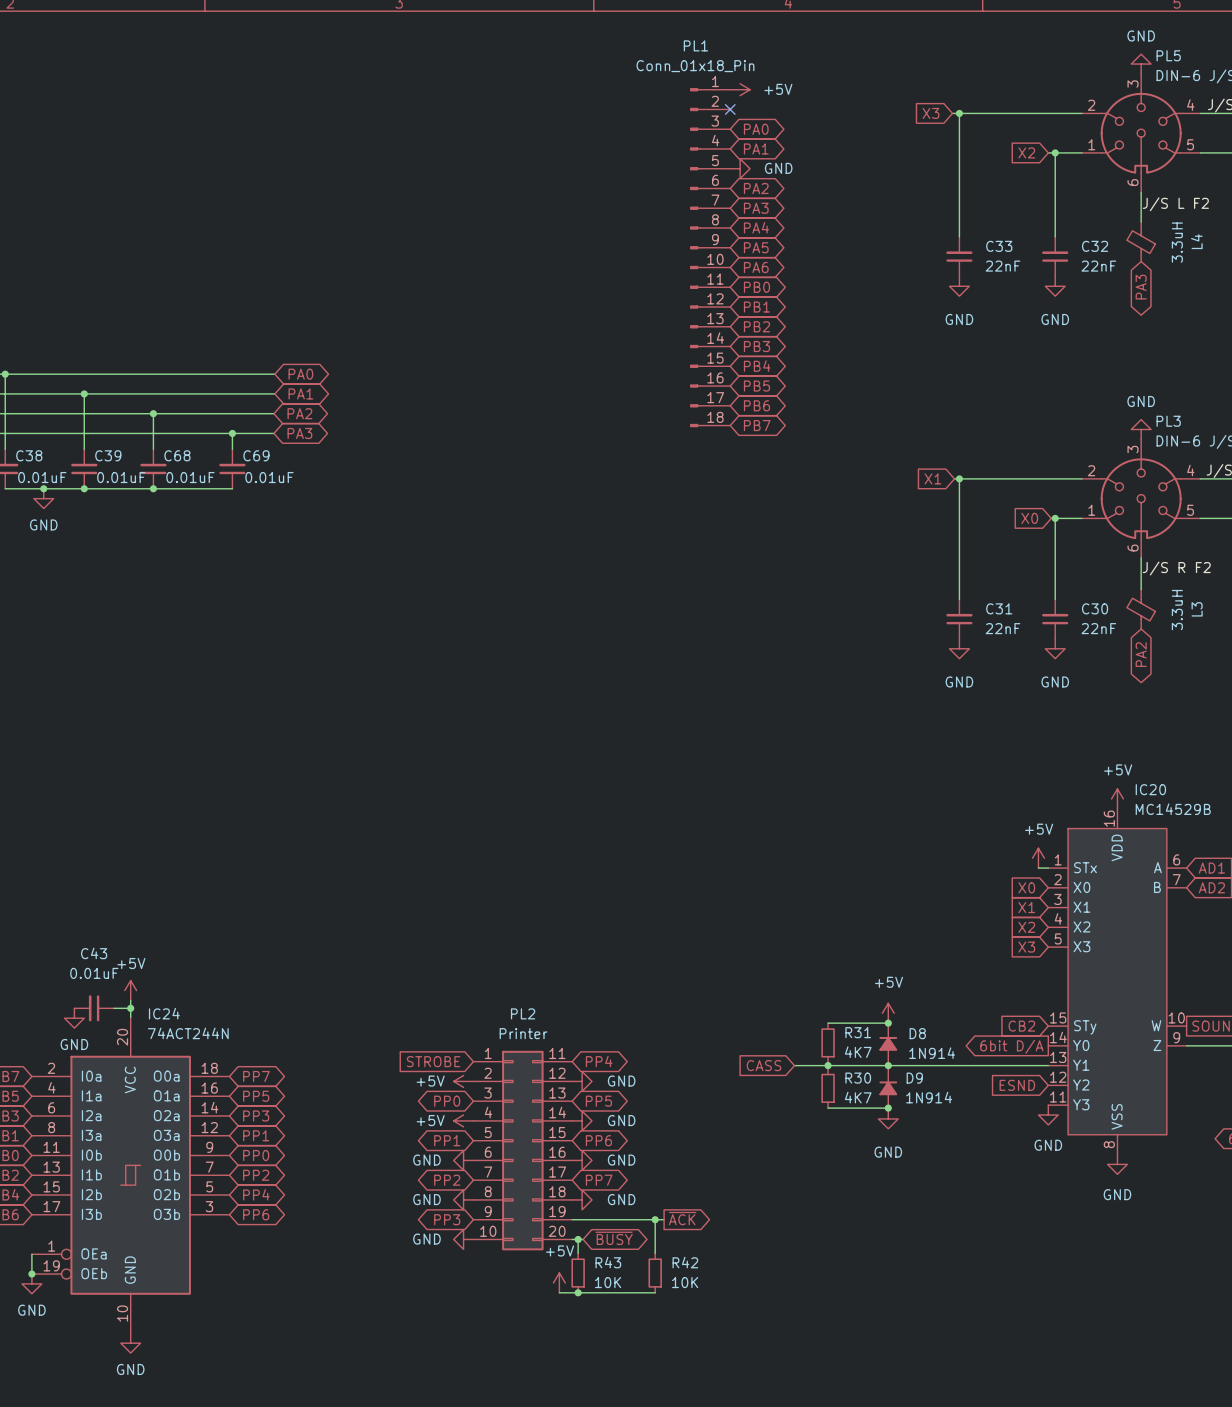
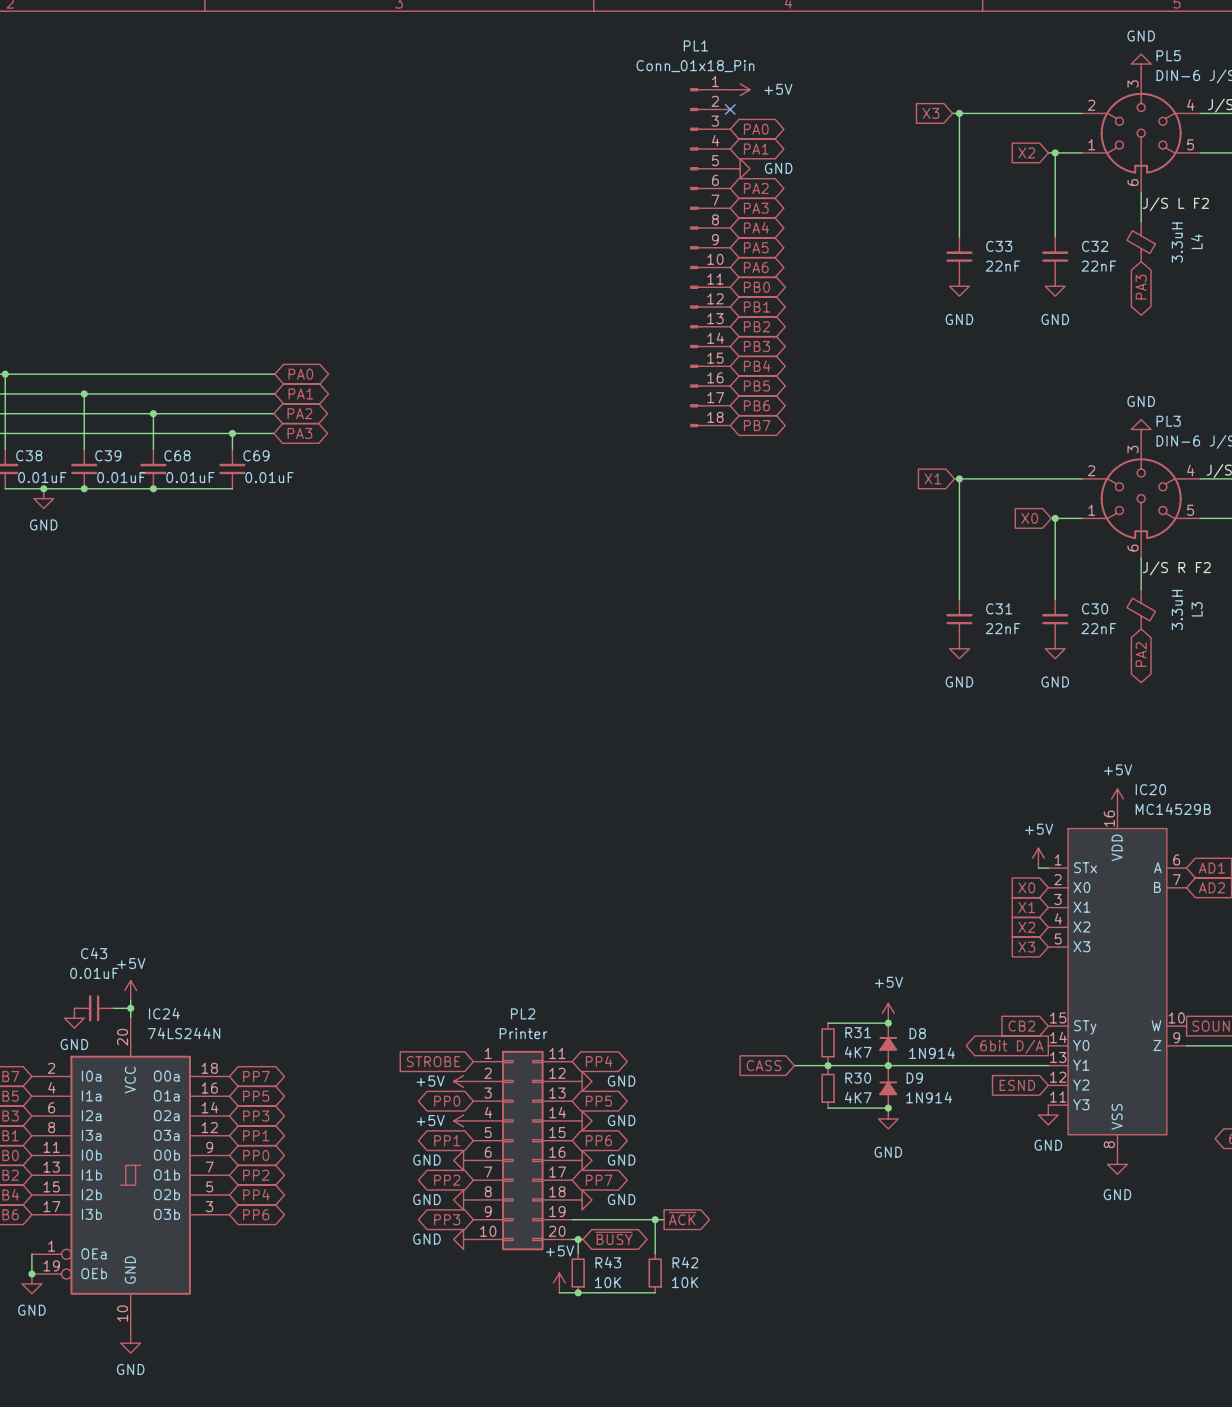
IC24 value: 74ACT244N (188, 1033) -> 74LS244N (184, 1033)

